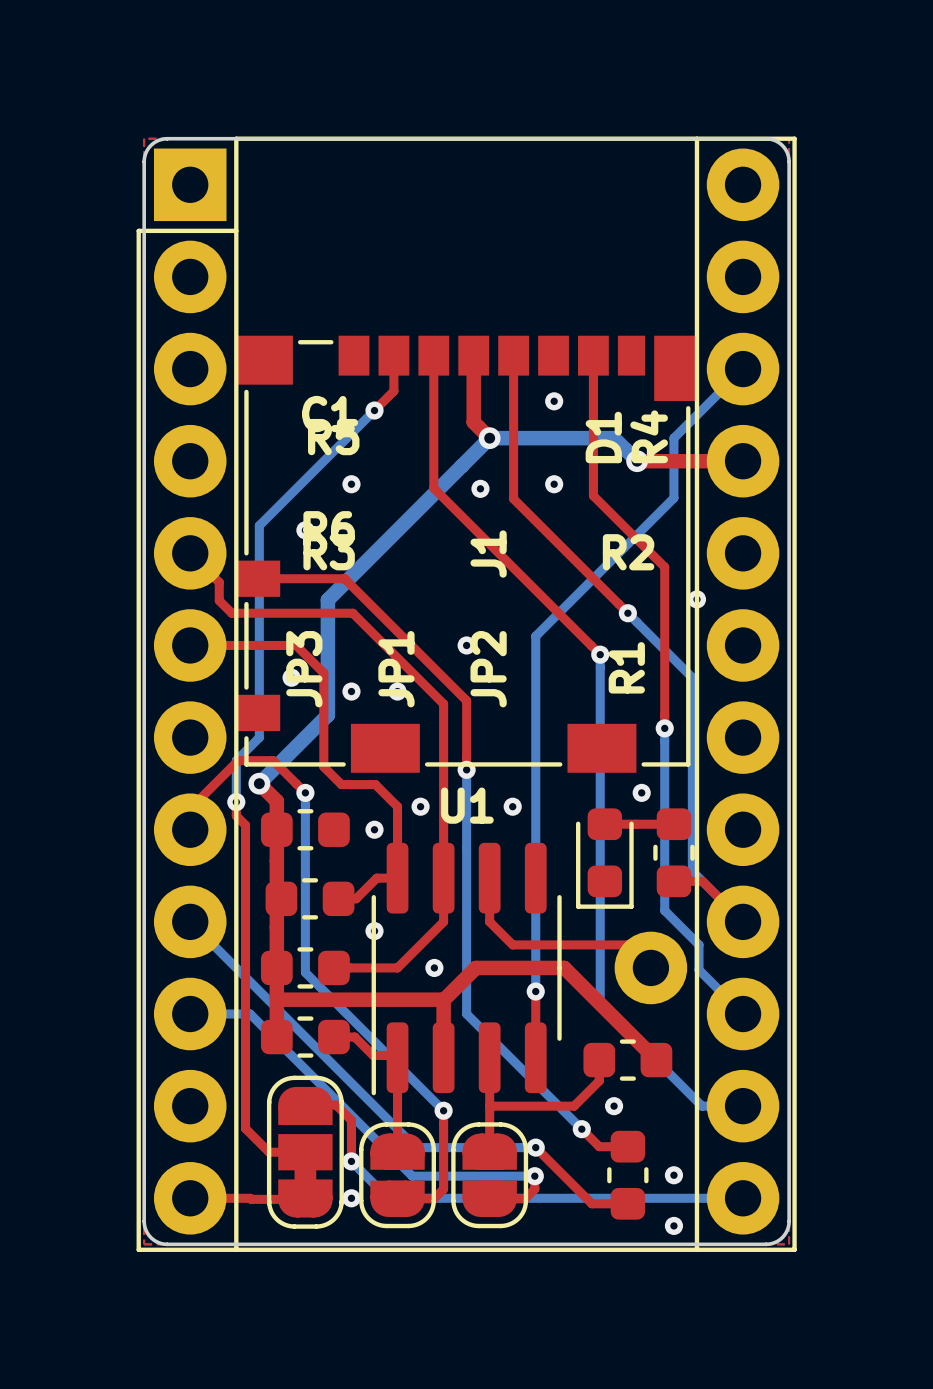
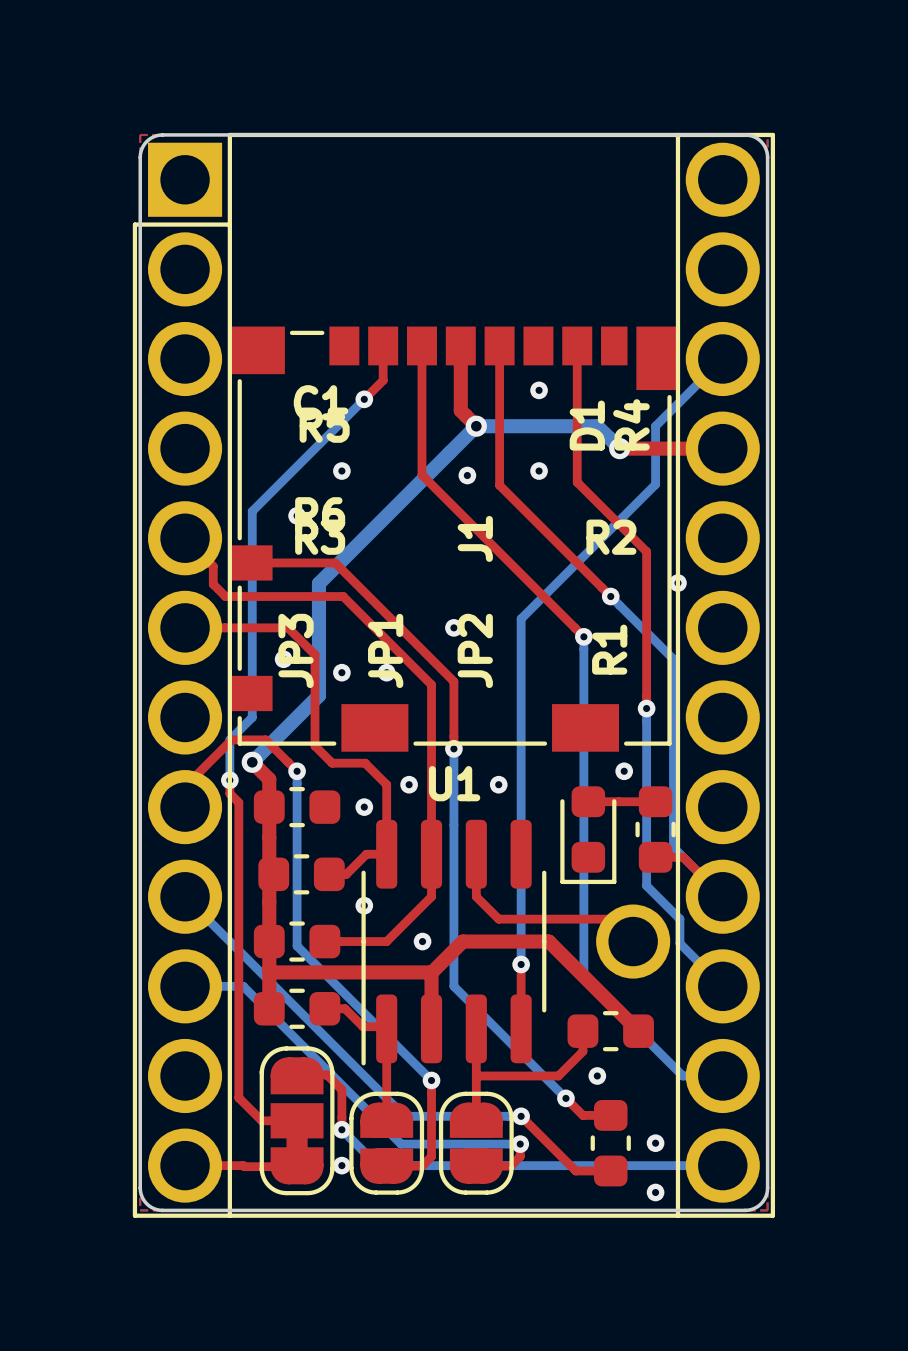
part footprint: [136, 136, 797, 1252] -> [132, 132, 776, 1218]
part footprint: [614, 931, 688, 1005] -> [596, 904, 671, 979]

